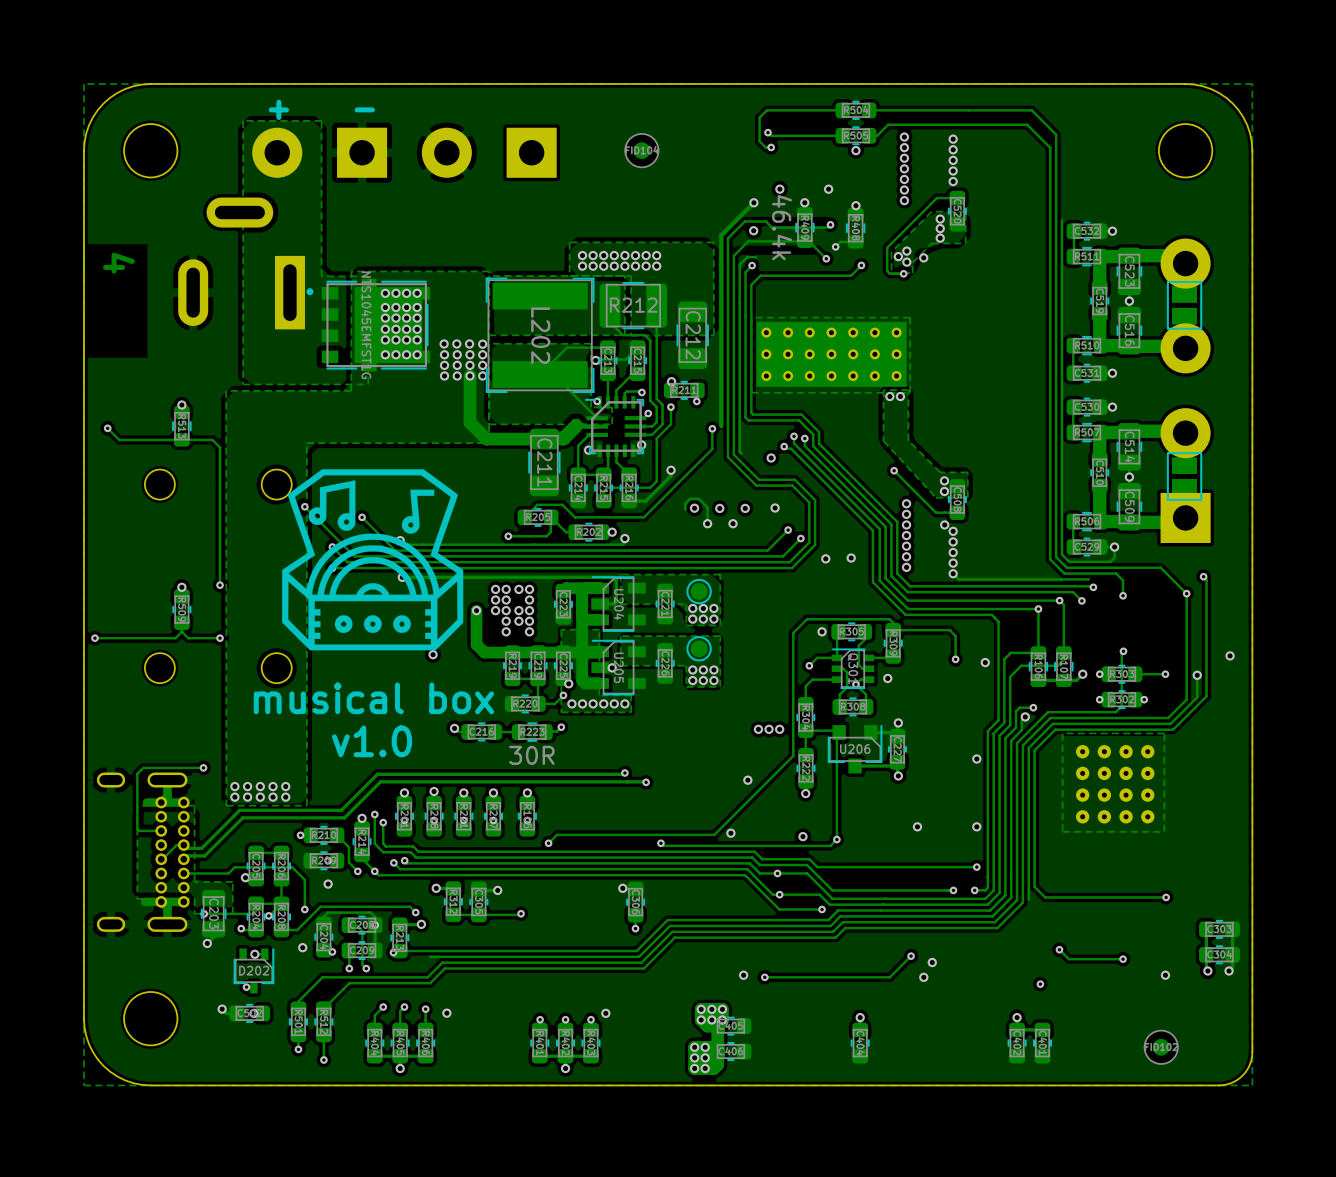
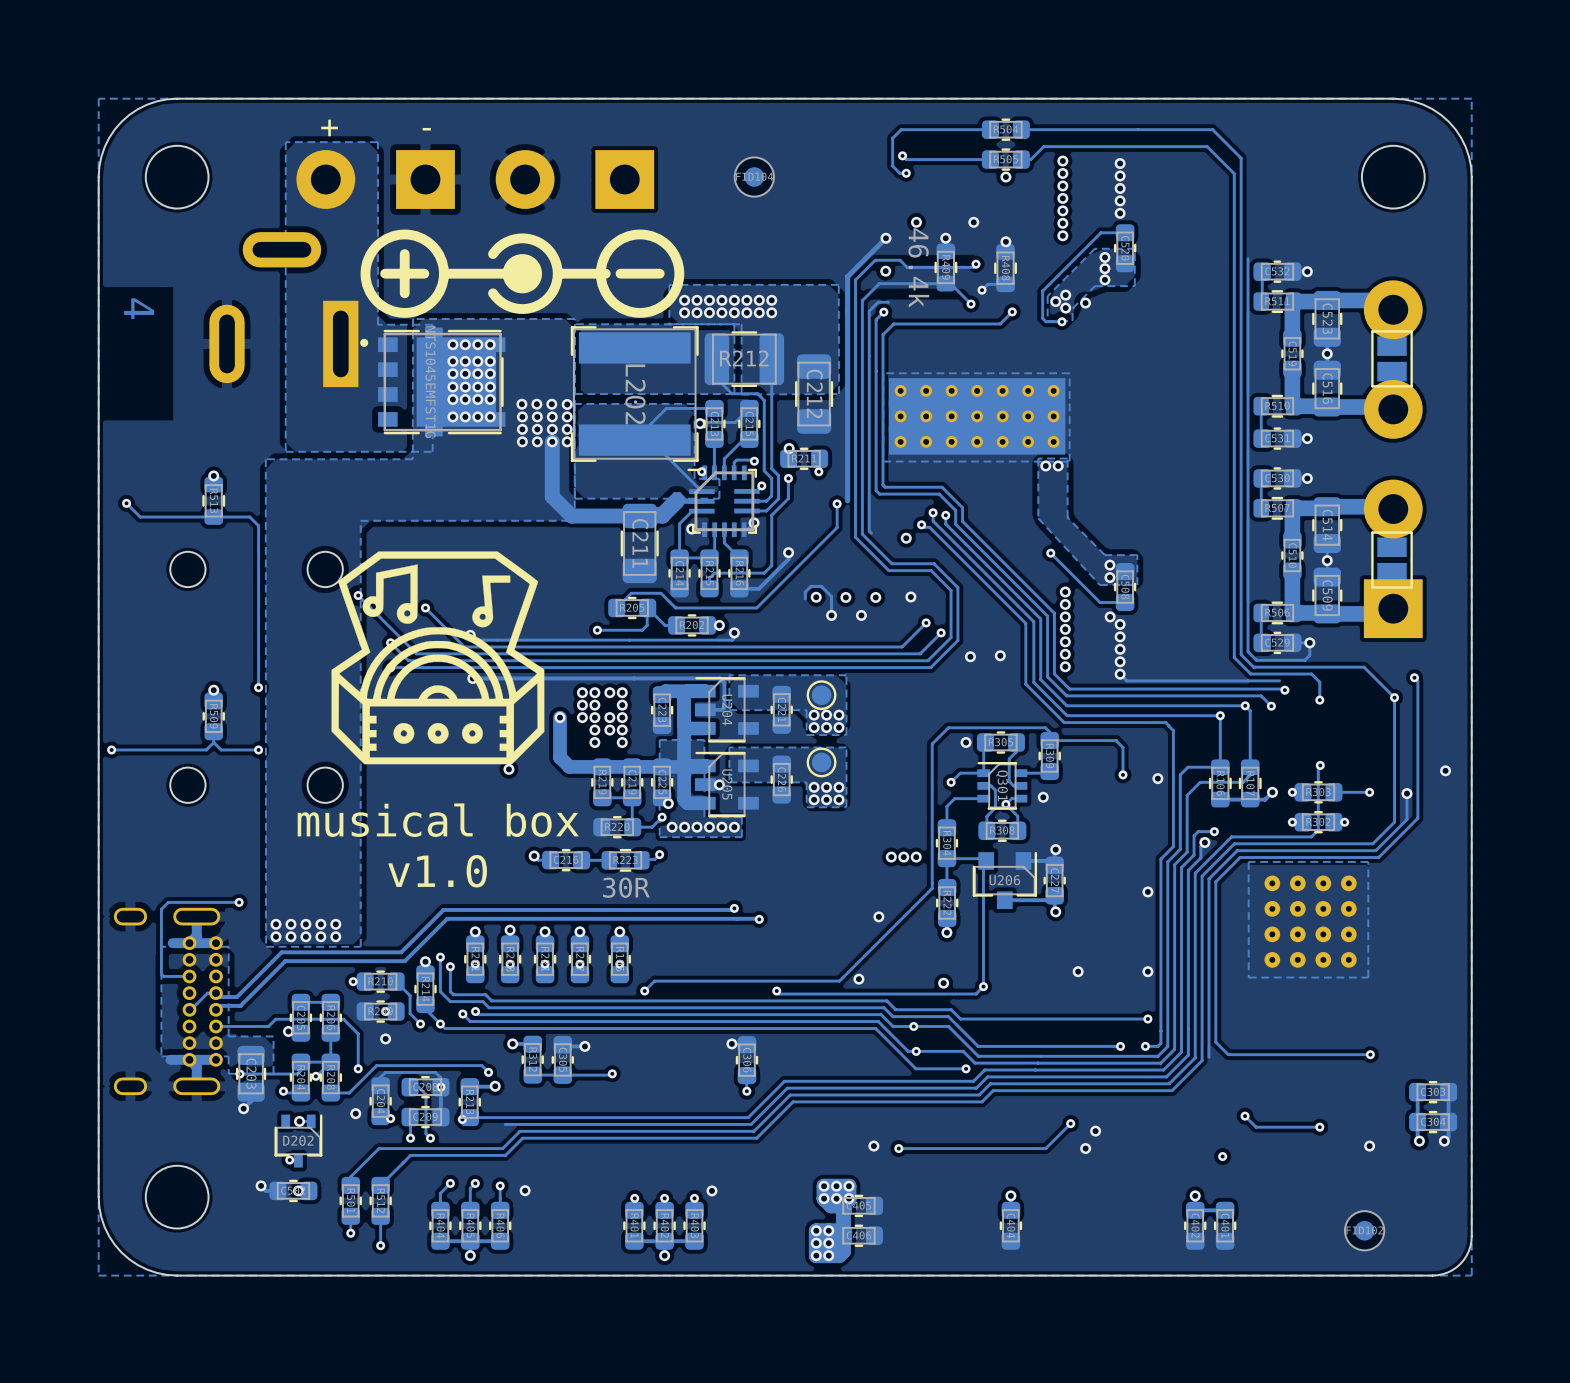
drawing: none -> [360, 229, 685, 318]

